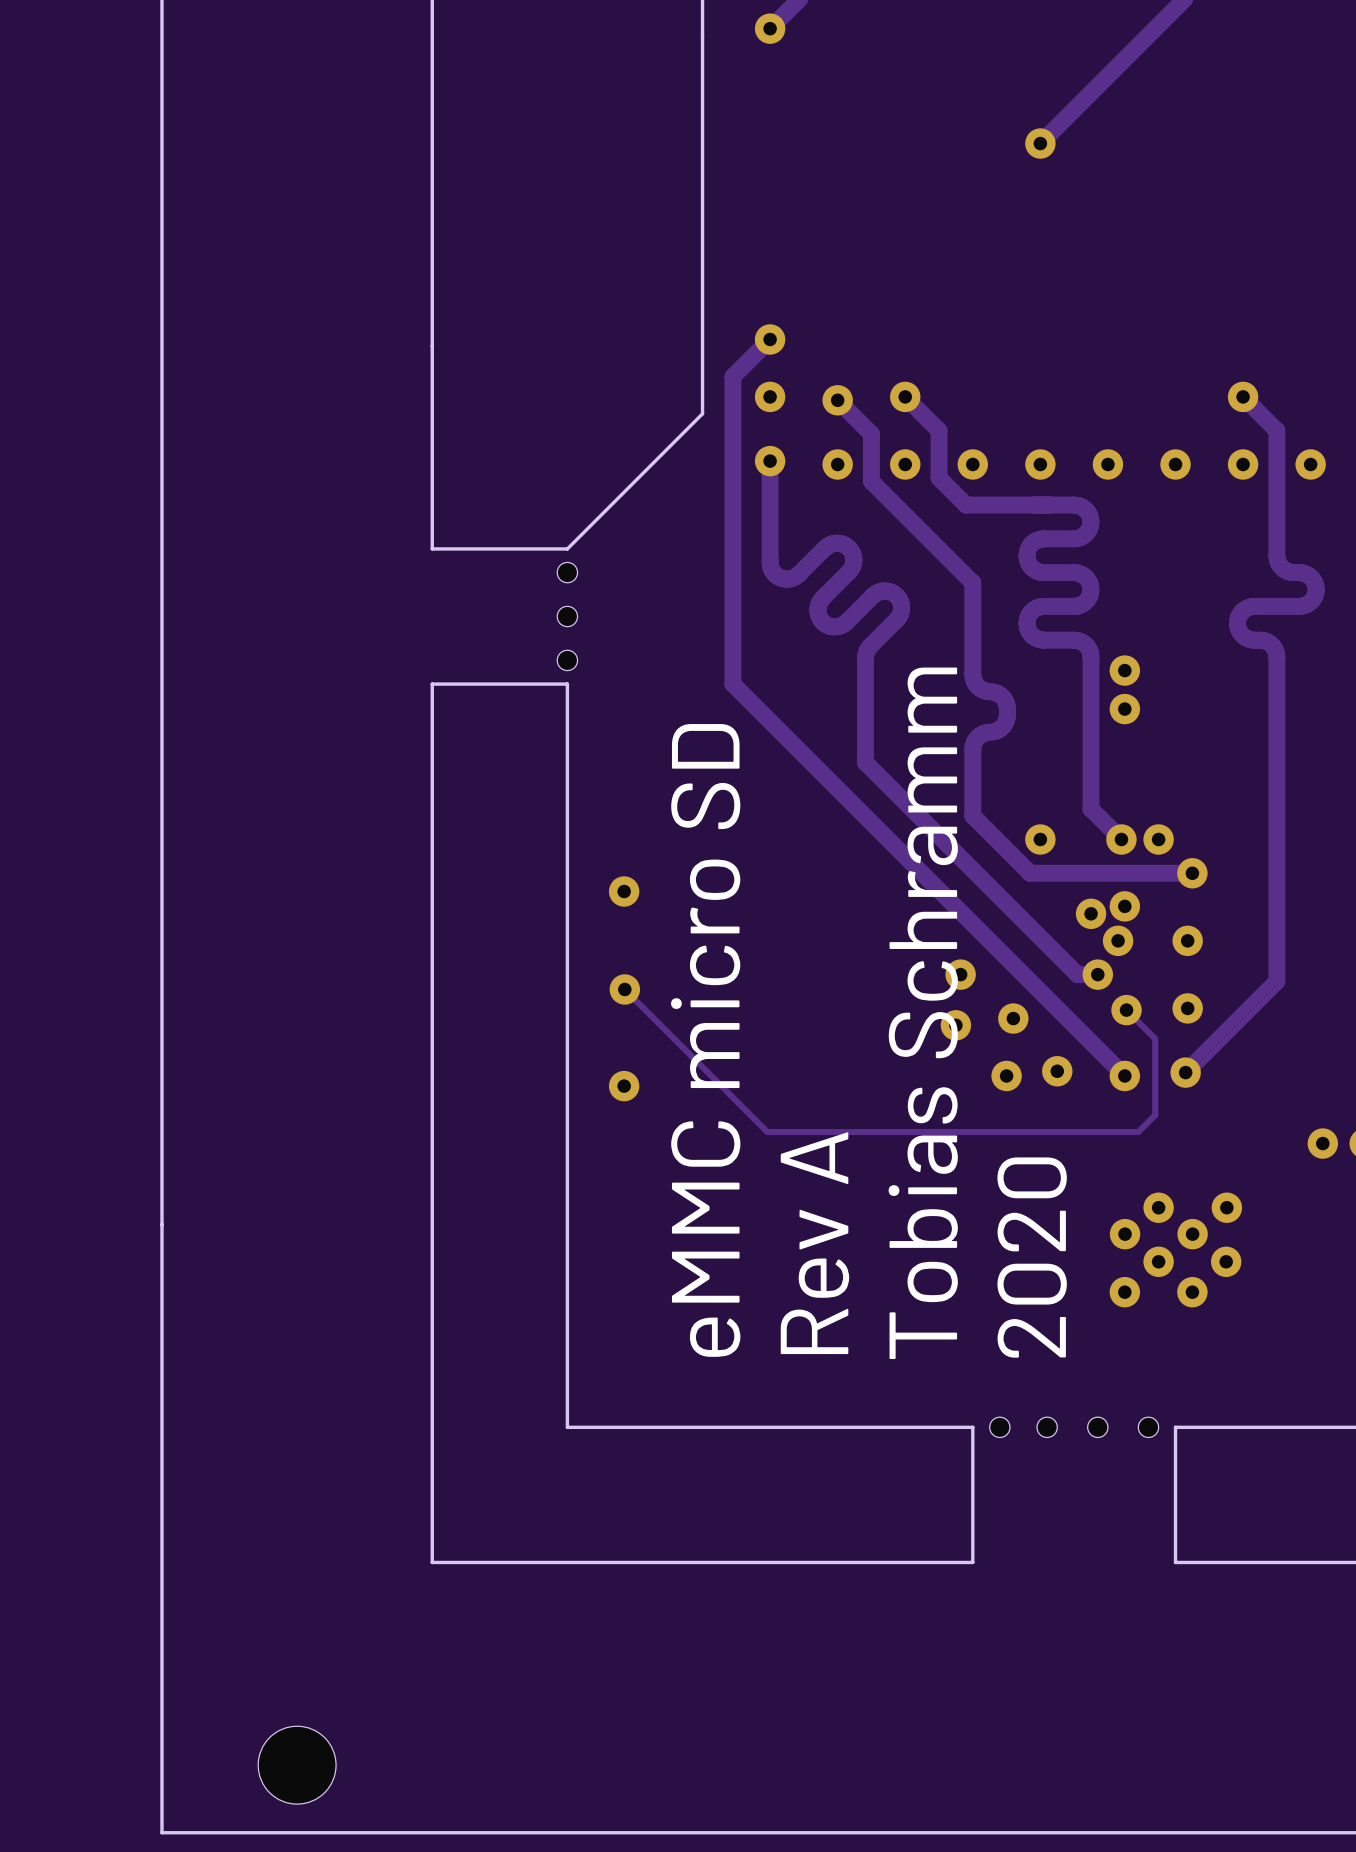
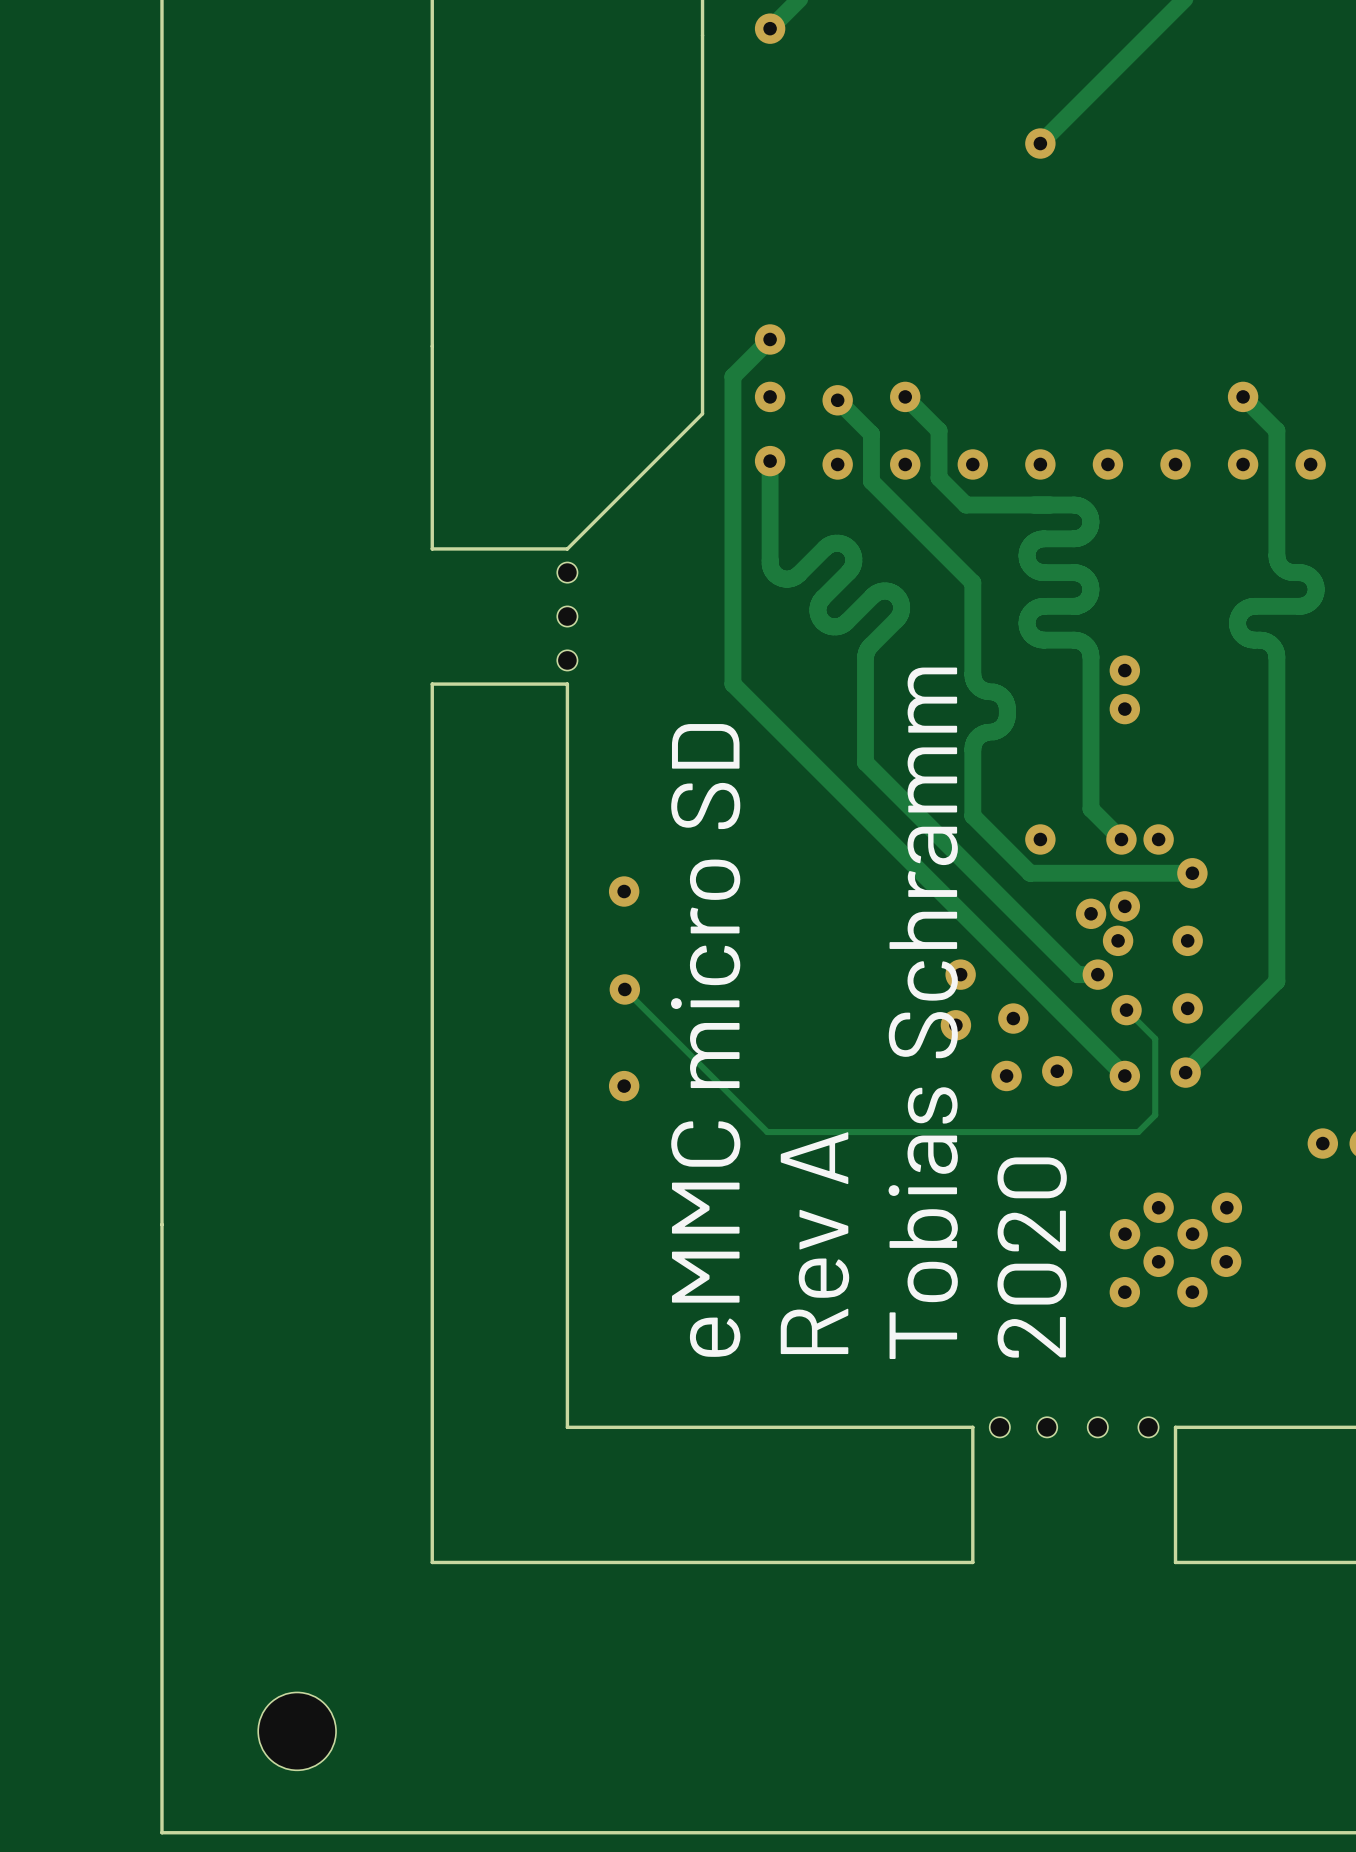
part position: (297, 1765) -> (297, 1731)

